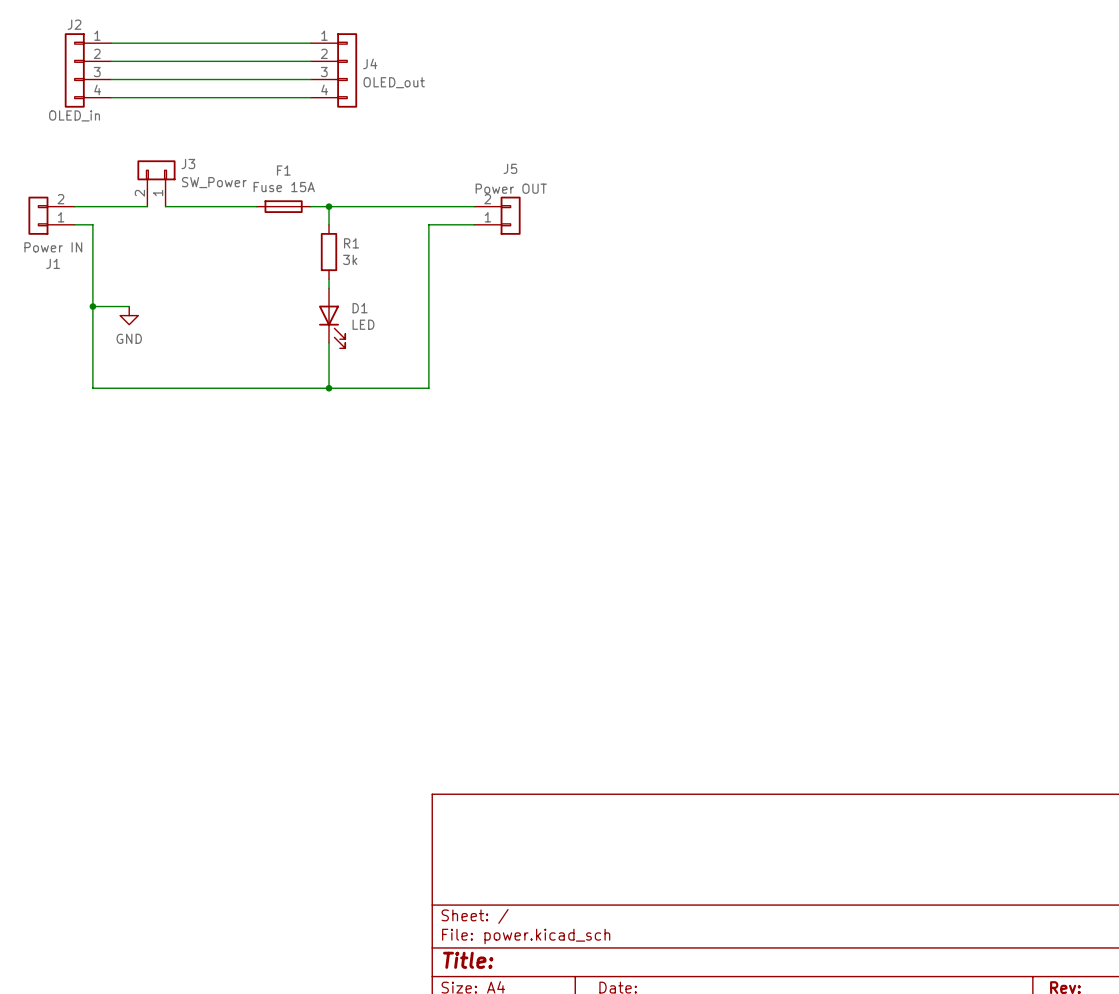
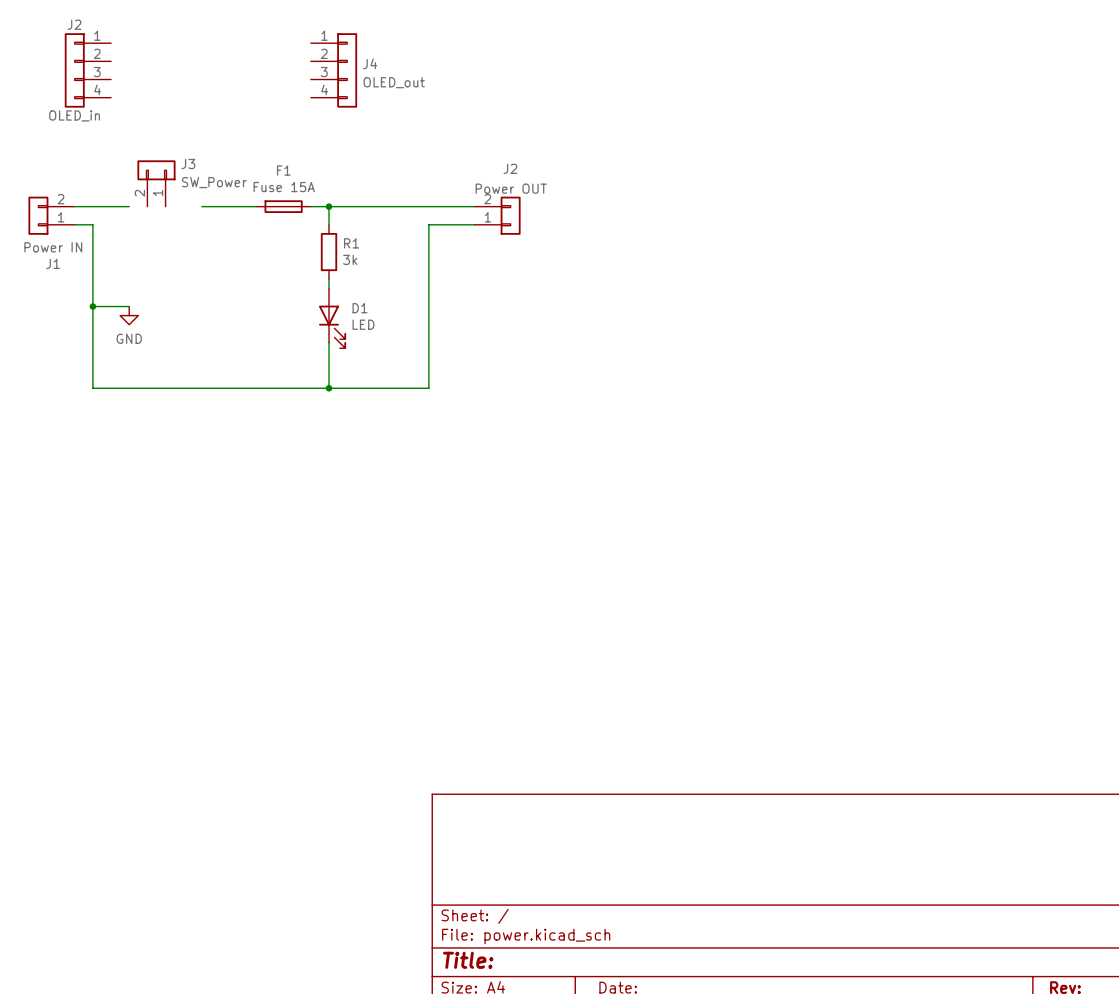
wire: (111, 43) (310, 43) -> none
wire: (111, 61) (310, 61) -> none
wire: (111, 79) (310, 79) -> none
wire: (111, 97) (310, 97) -> none
J5 name: J5 (510, 168) -> J2 (510, 168)
wire: (129, 206) (147, 206) -> none
wire: (165, 206) (201, 206) -> none

